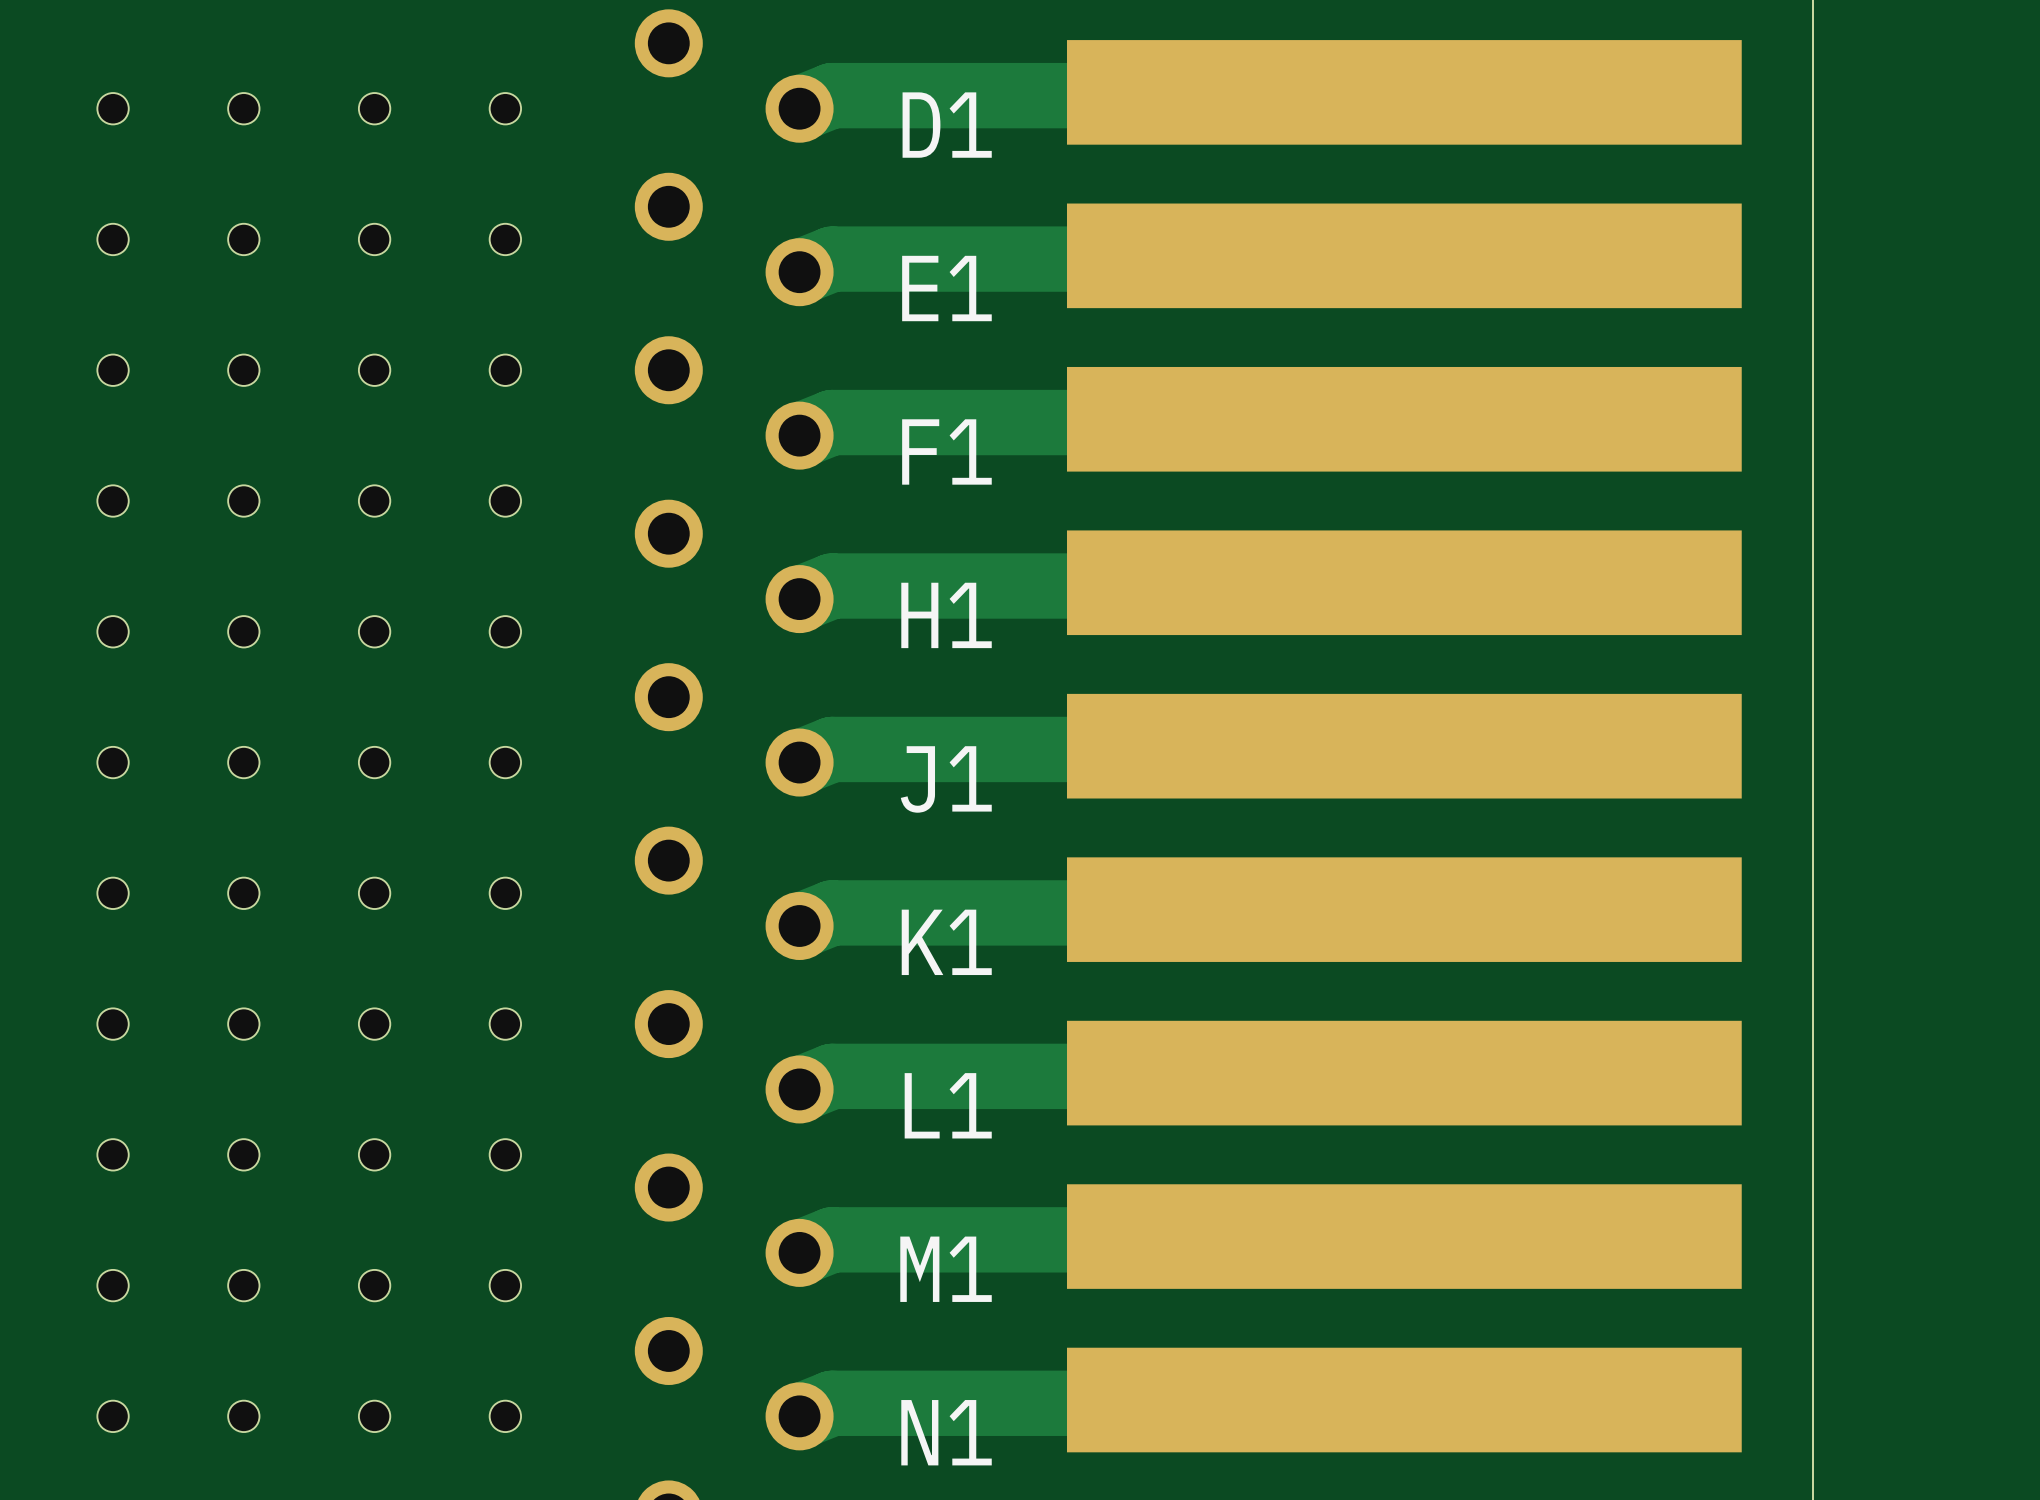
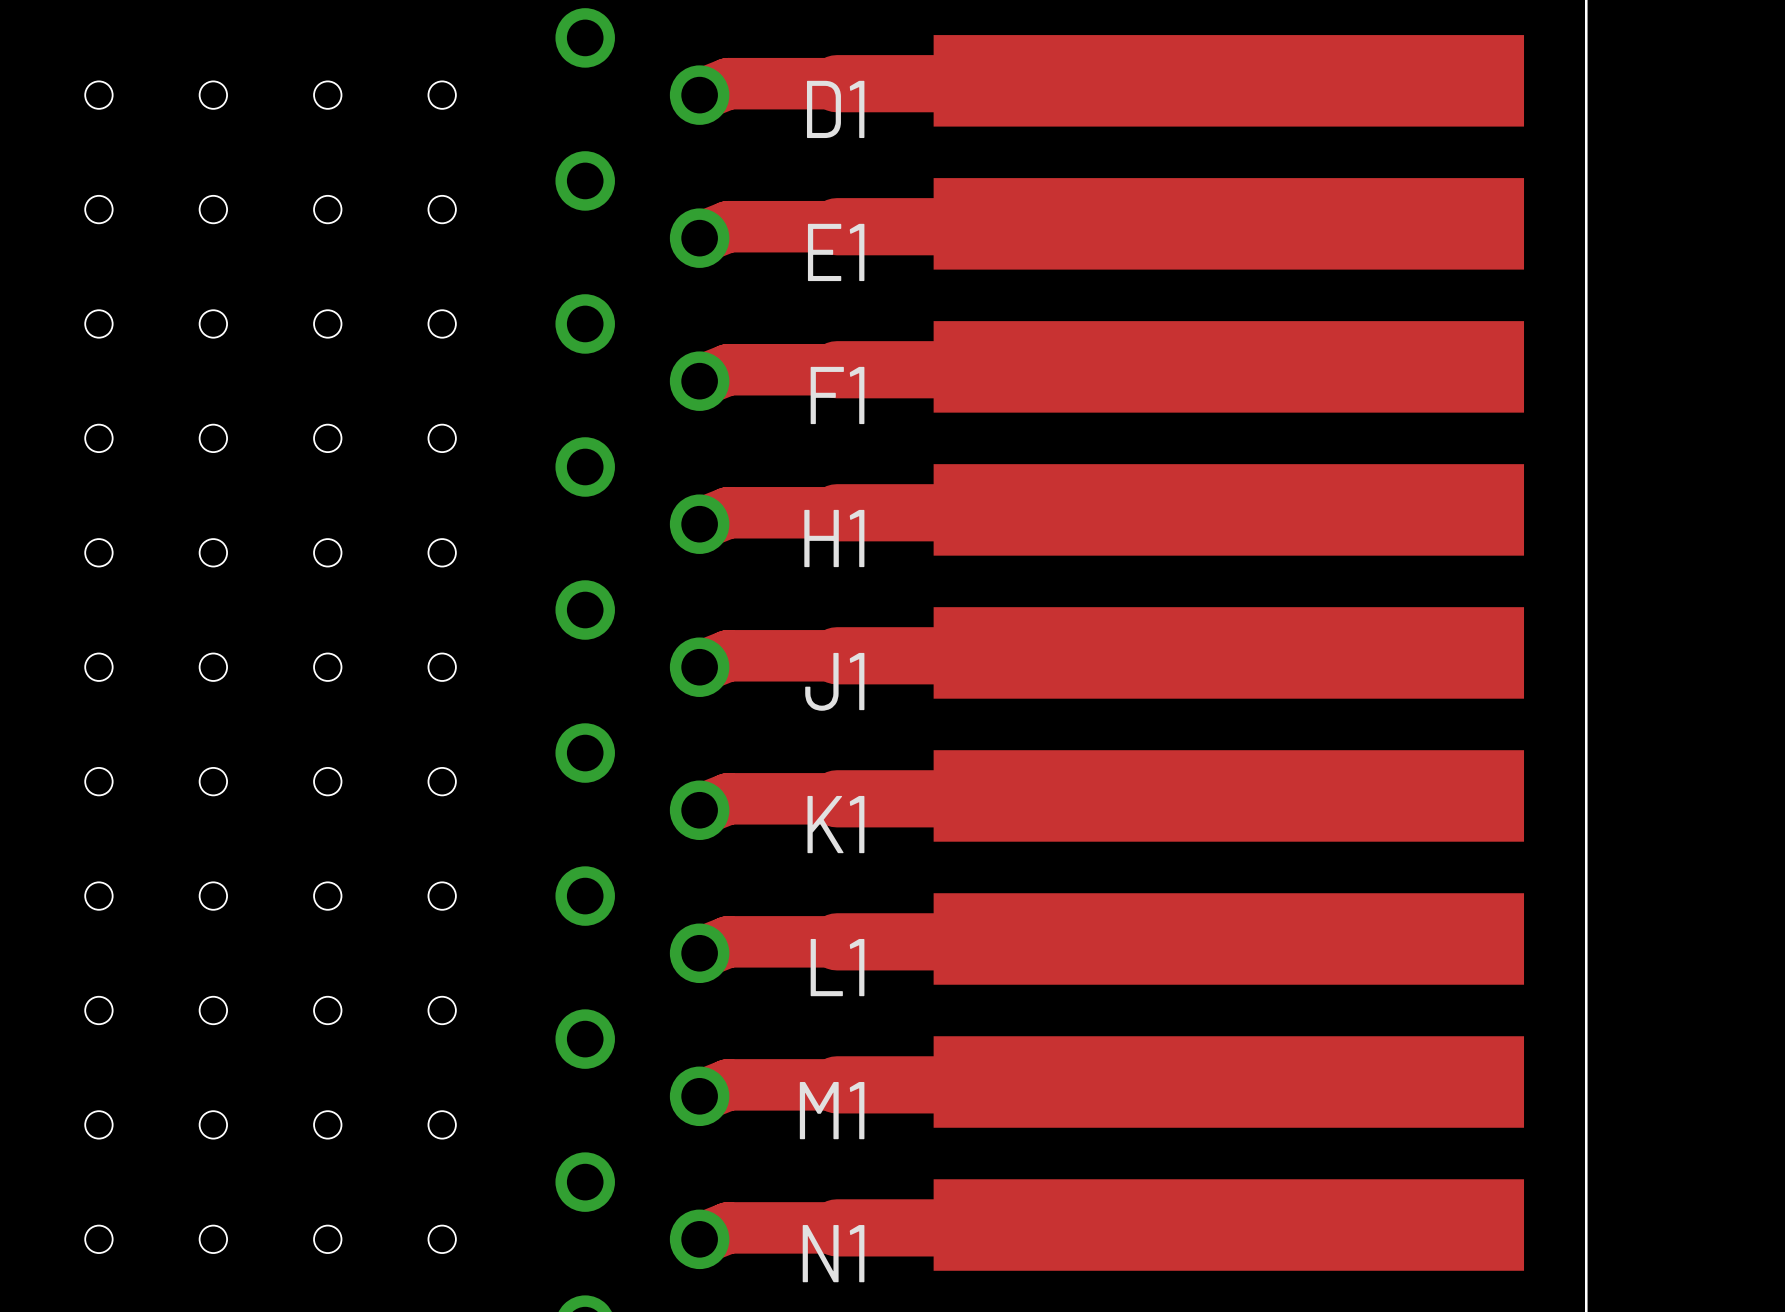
track width: thick (956, 95) (832, 95) (799, 108) -> thin (836, 83) (728, 83) (699, 95)
track width: thick (956, 259) (832, 259) (799, 272) -> thin (836, 226) (728, 226) (699, 238)
track width: thick (956, 422) (832, 422) (799, 435) -> thin (836, 369) (728, 369) (699, 381)
track width: thick (956, 586) (832, 586) (799, 599) -> thin (836, 512) (728, 512) (699, 524)
track width: thick (956, 749) (832, 749) (799, 762) -> thin (836, 655) (728, 655) (699, 667)
track width: thick (956, 912) (832, 912) (799, 926) -> thin (836, 798) (728, 798) (699, 810)
track width: thick (956, 1076) (832, 1076) (799, 1089) -> thin (836, 941) (728, 941) (699, 953)
track width: thick (956, 1239) (832, 1239) (799, 1252) -> thin (836, 1084) (728, 1084) (699, 1096)
track width: thick (956, 1403) (832, 1403) (799, 1416) -> thin (836, 1227) (728, 1227) (699, 1239)

